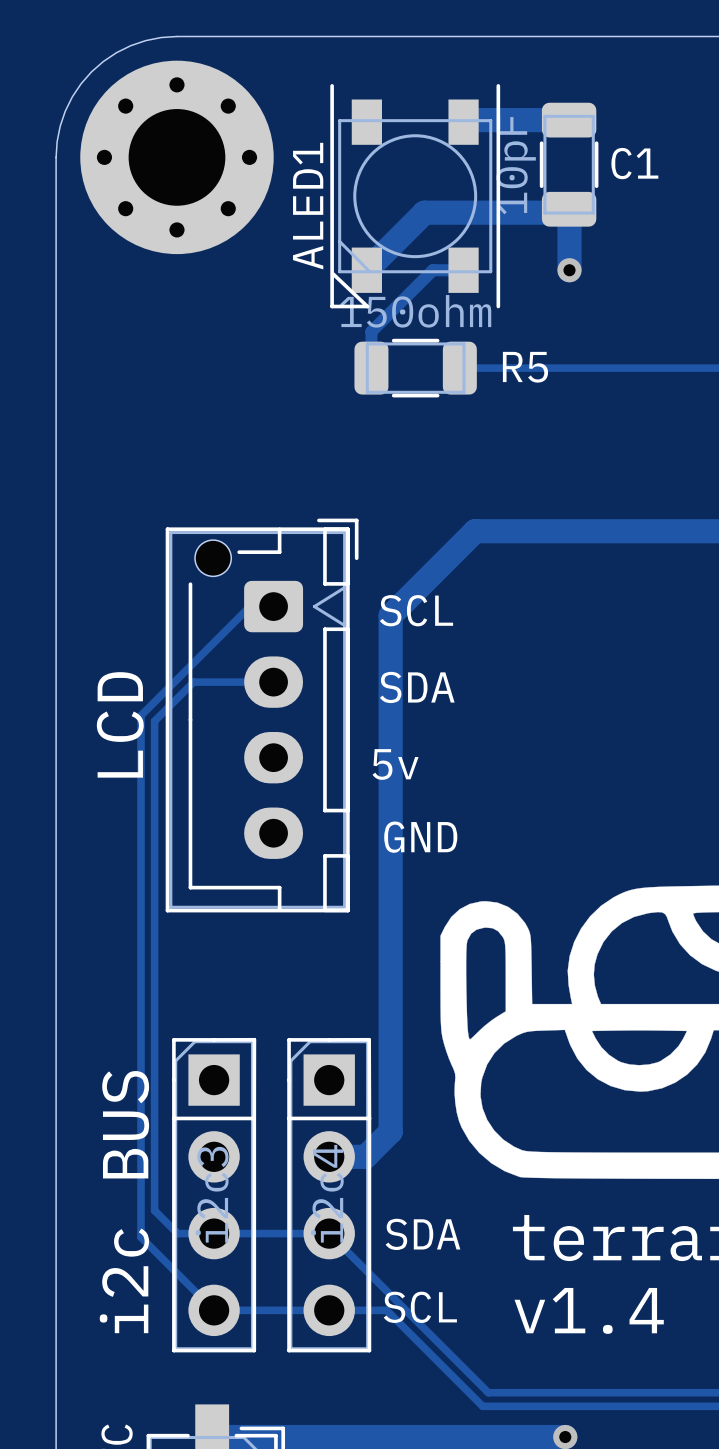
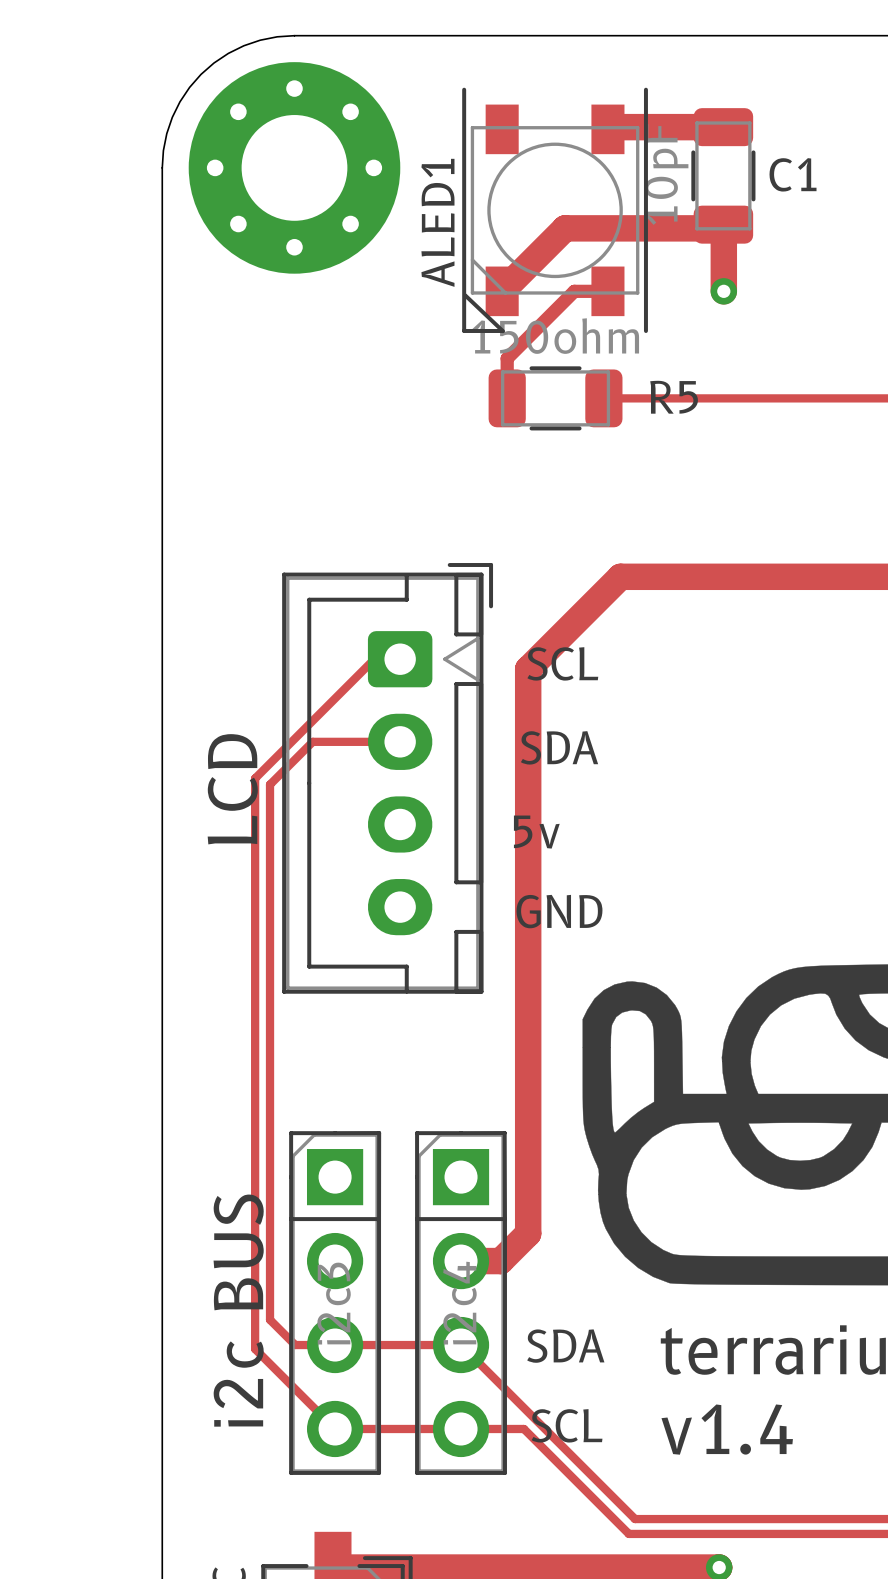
part footprint: [165, 518, 359, 913] -> [282, 563, 494, 994]

